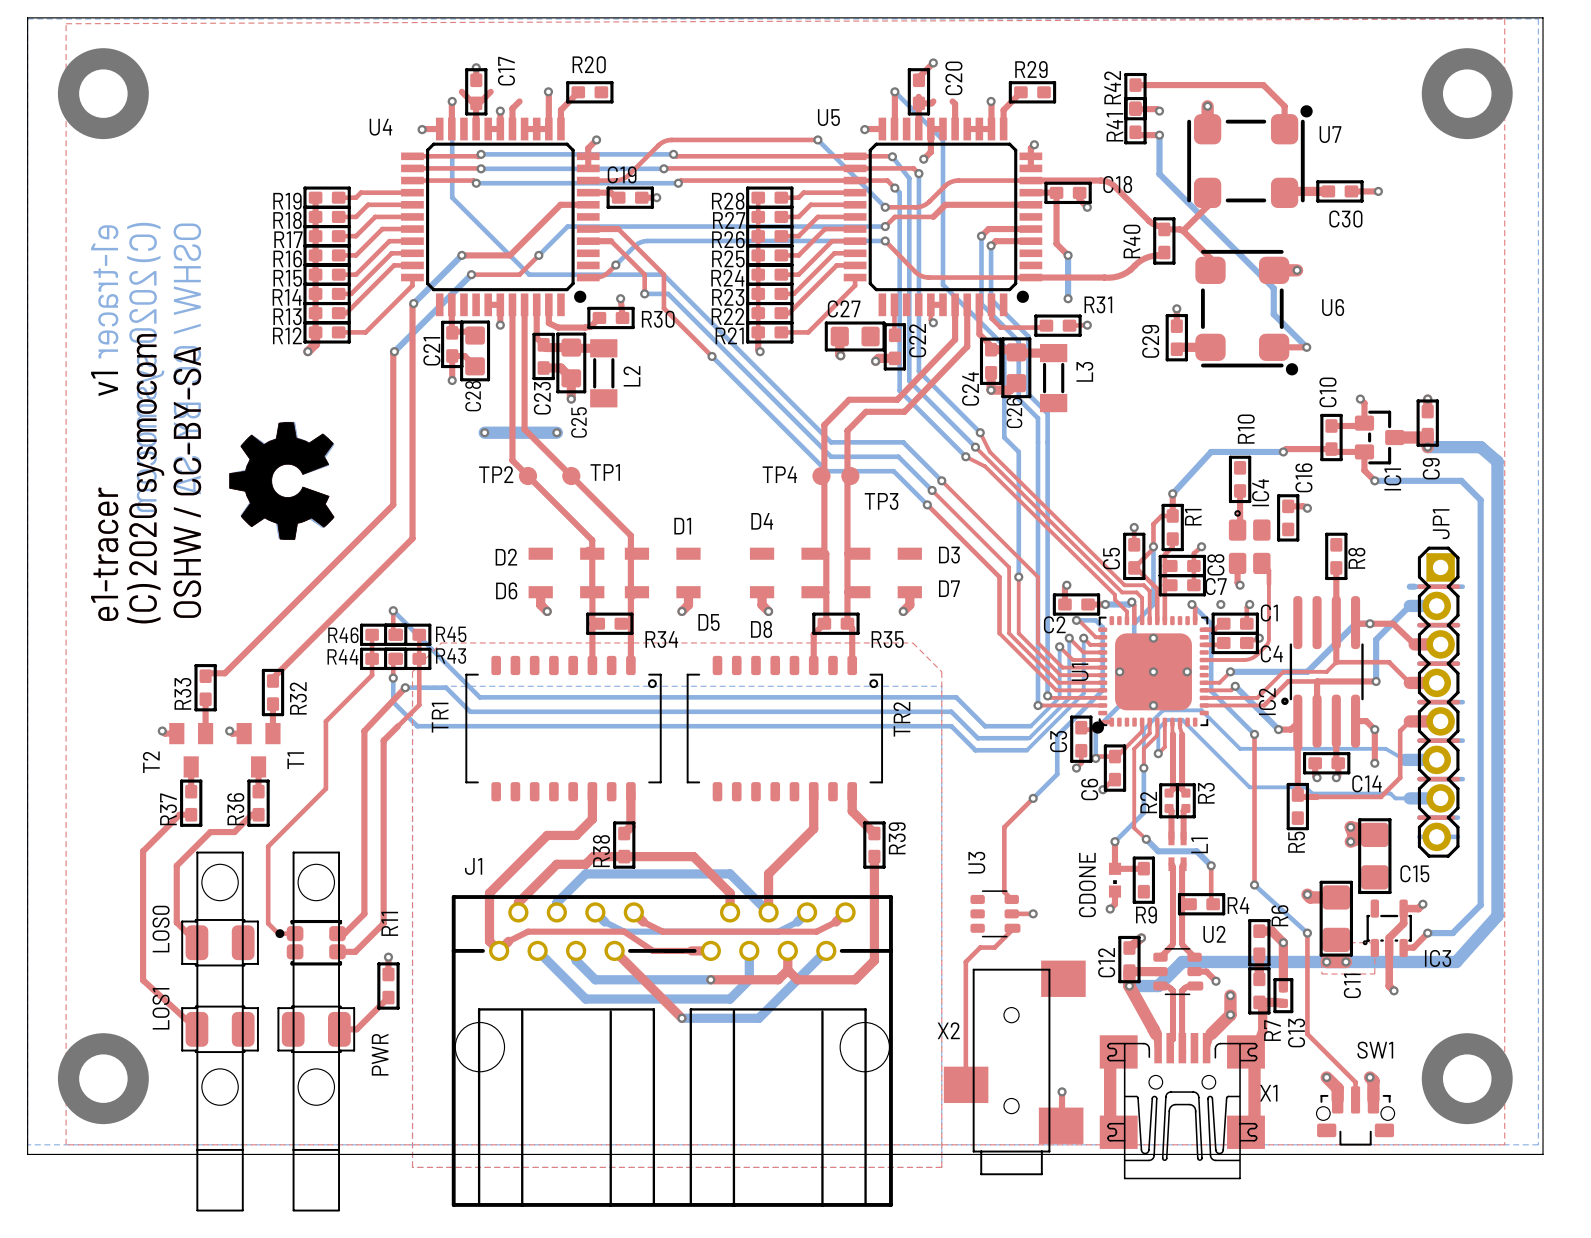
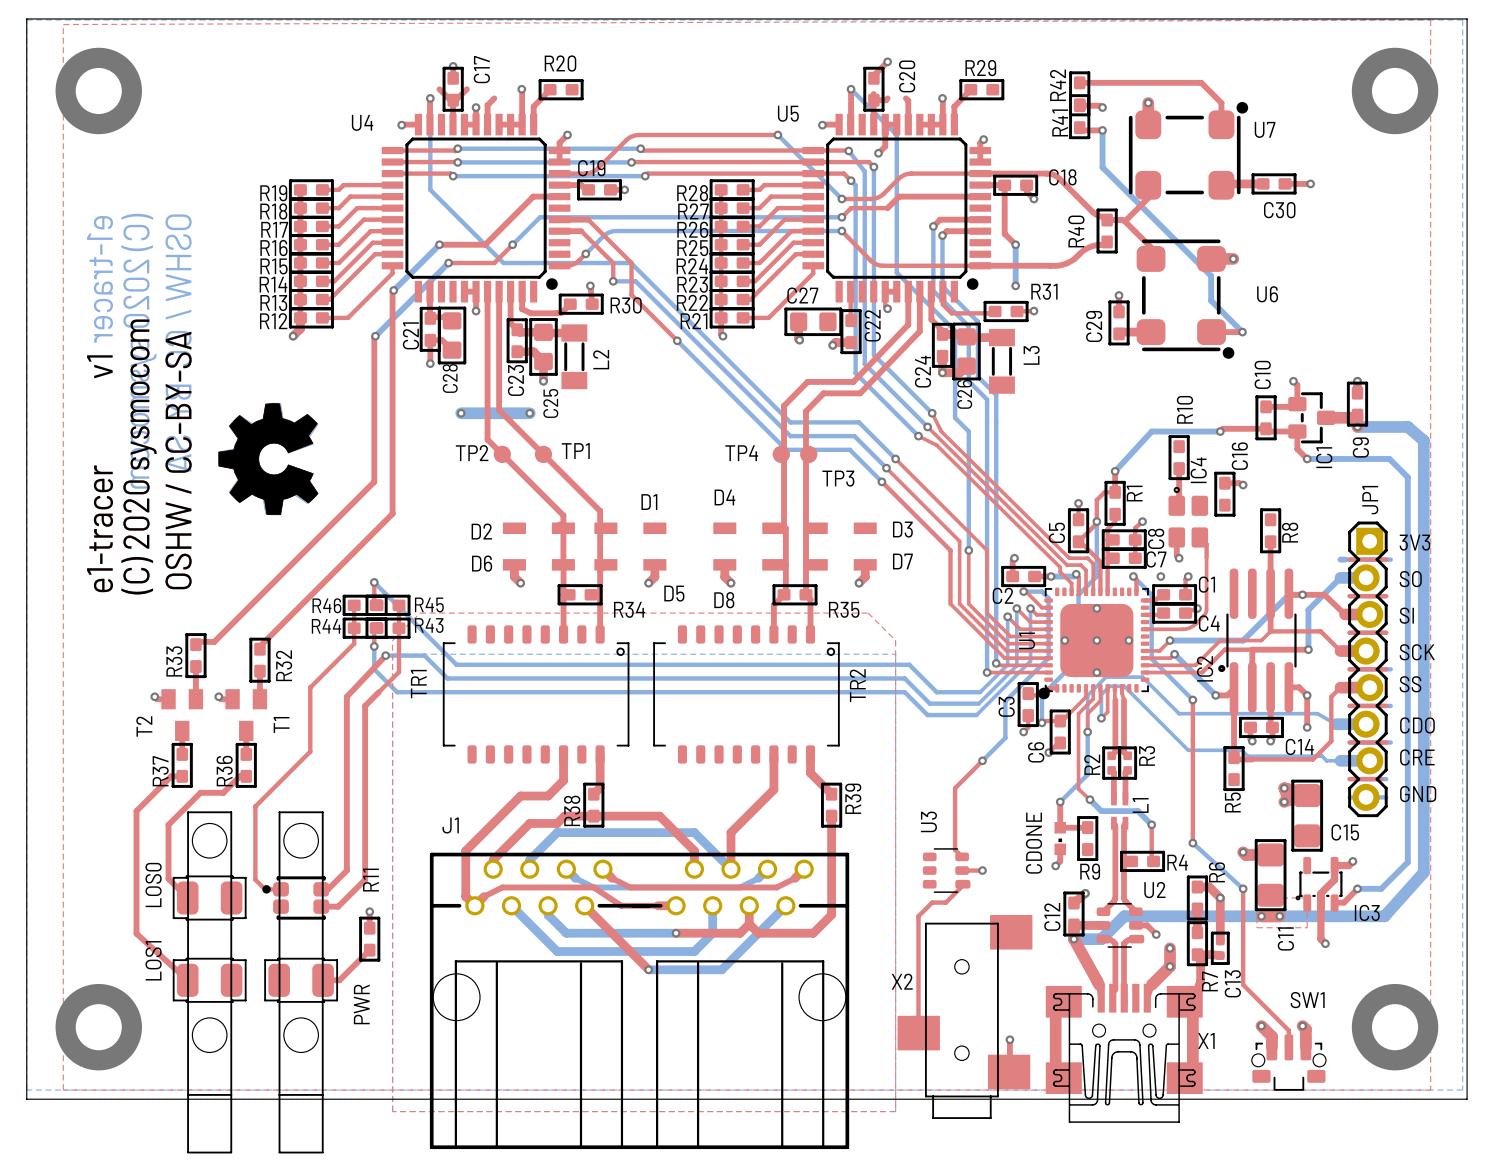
text: none -> 3V3 (1414, 542)
text: none -> SO (1410, 579)
text: none -> SI (1406, 615)
text: none -> SCK (1417, 652)
text: none -> SS (1410, 684)
text: none -> CDO (1417, 725)
text: none -> CRE (1417, 757)
text: none -> GND (1418, 794)

